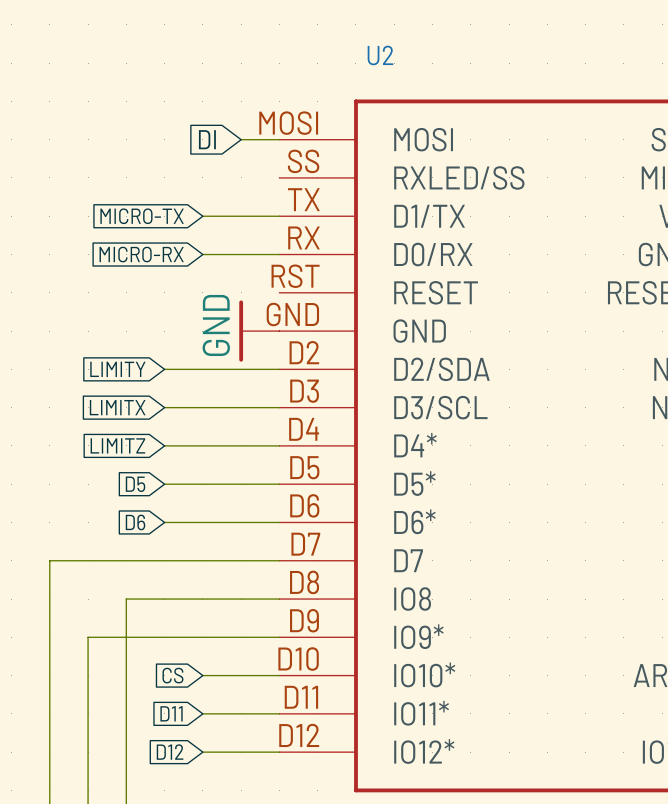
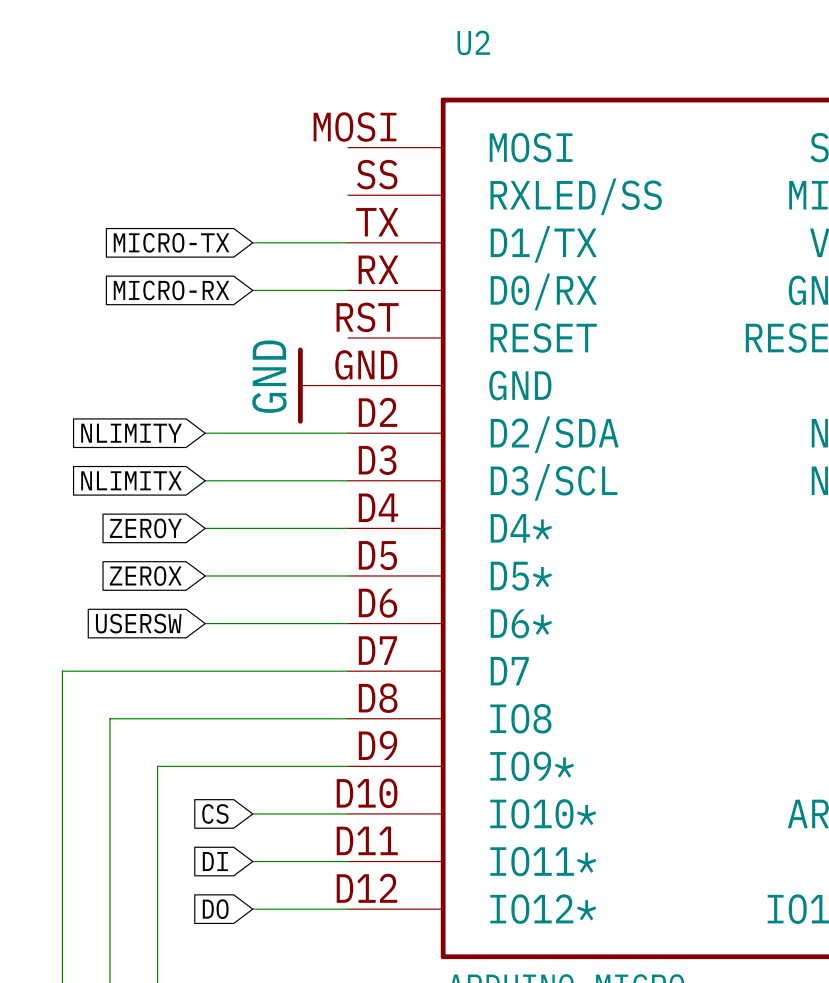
global label: DI (207, 139) -> none
wire: (241, 139) (279, 139) -> none
global label: LIMITY (117, 369) -> NLIMITY (131, 433)
global label: LIMITX (117, 407) -> NLIMITX (131, 480)
global label: LIMITZ (117, 445) -> ZEROY (145, 528)
global label: D5 (135, 484) -> ZEROX (145, 575)
global label: D6 (135, 522) -> USERSW (138, 623)
wire: (126, 599) (126, 637) (88, 637) -> (157, 718) (110, 718) (110, 766)
global label: D11 (171, 713) -> DI (215, 861)
global label: D12 (170, 752) -> DO (215, 909)

